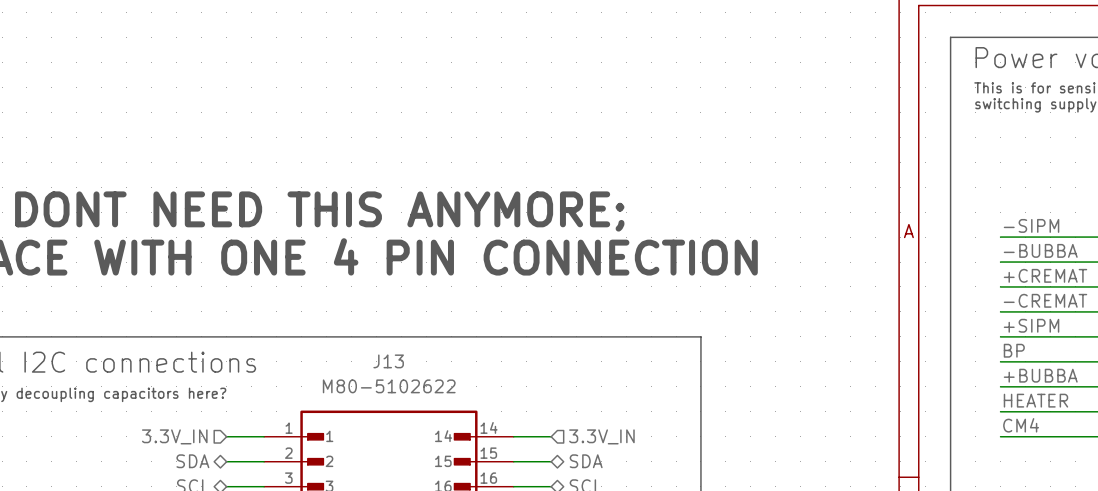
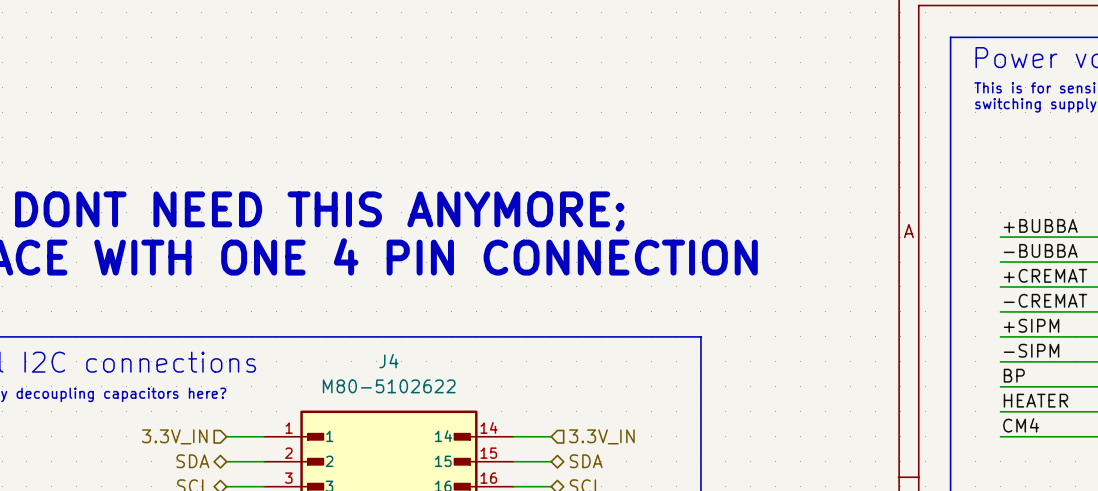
label: -SIPM (1031, 225) -> +BUBBA (1040, 225)
label: BP (1014, 350) -> -SIPM (1031, 350)
J13 name: J13 (388, 361) -> J4 (388, 361)
label: +BUBBA (1040, 375) -> BP (1014, 375)

